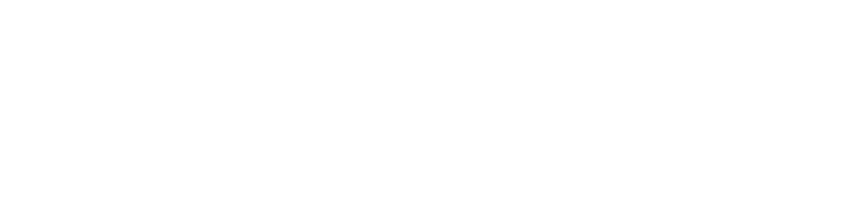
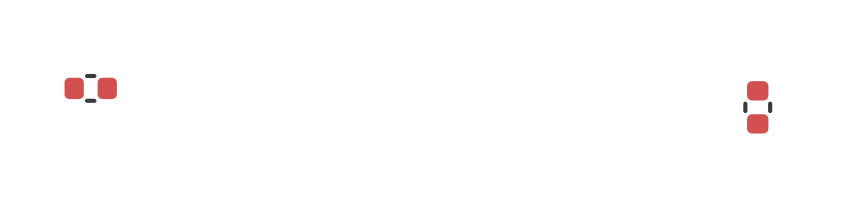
part: none -> (90, 88)
part: none -> (757, 107)

